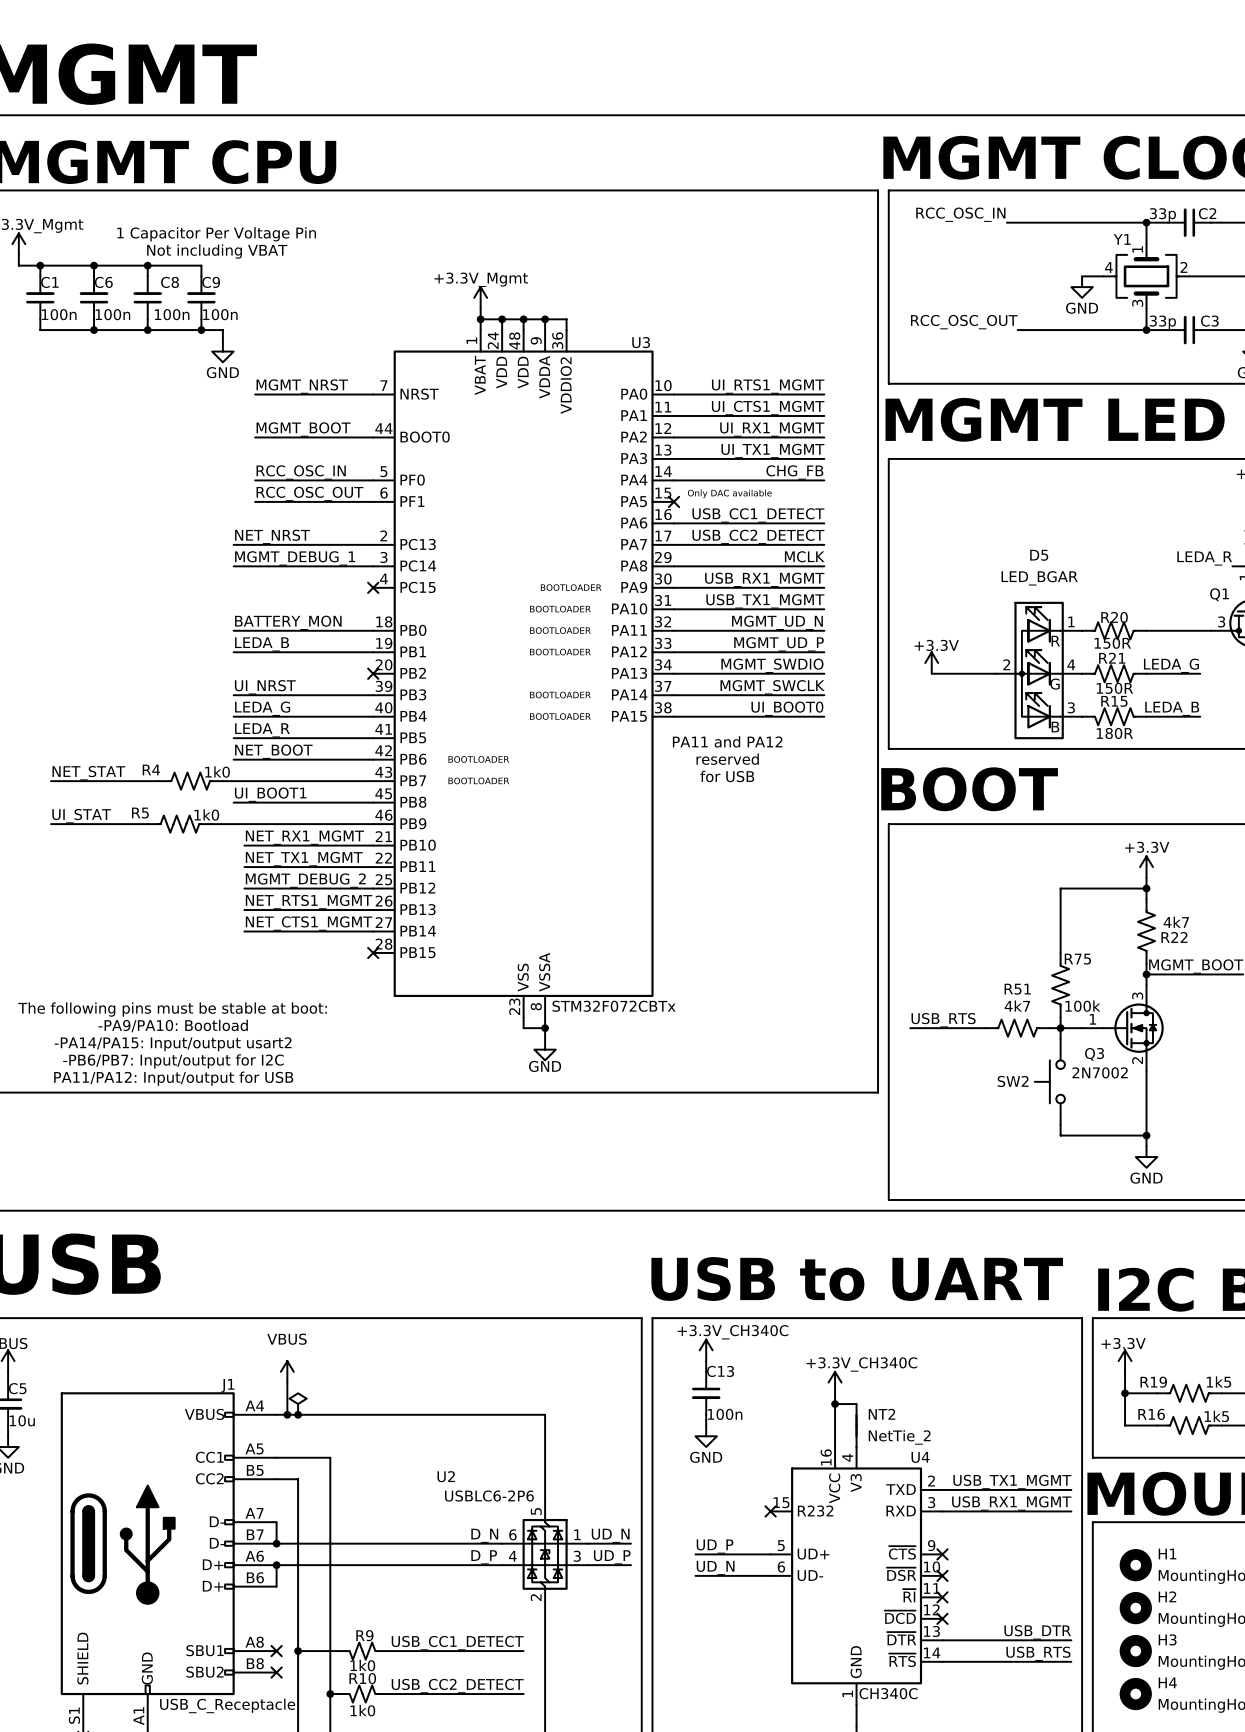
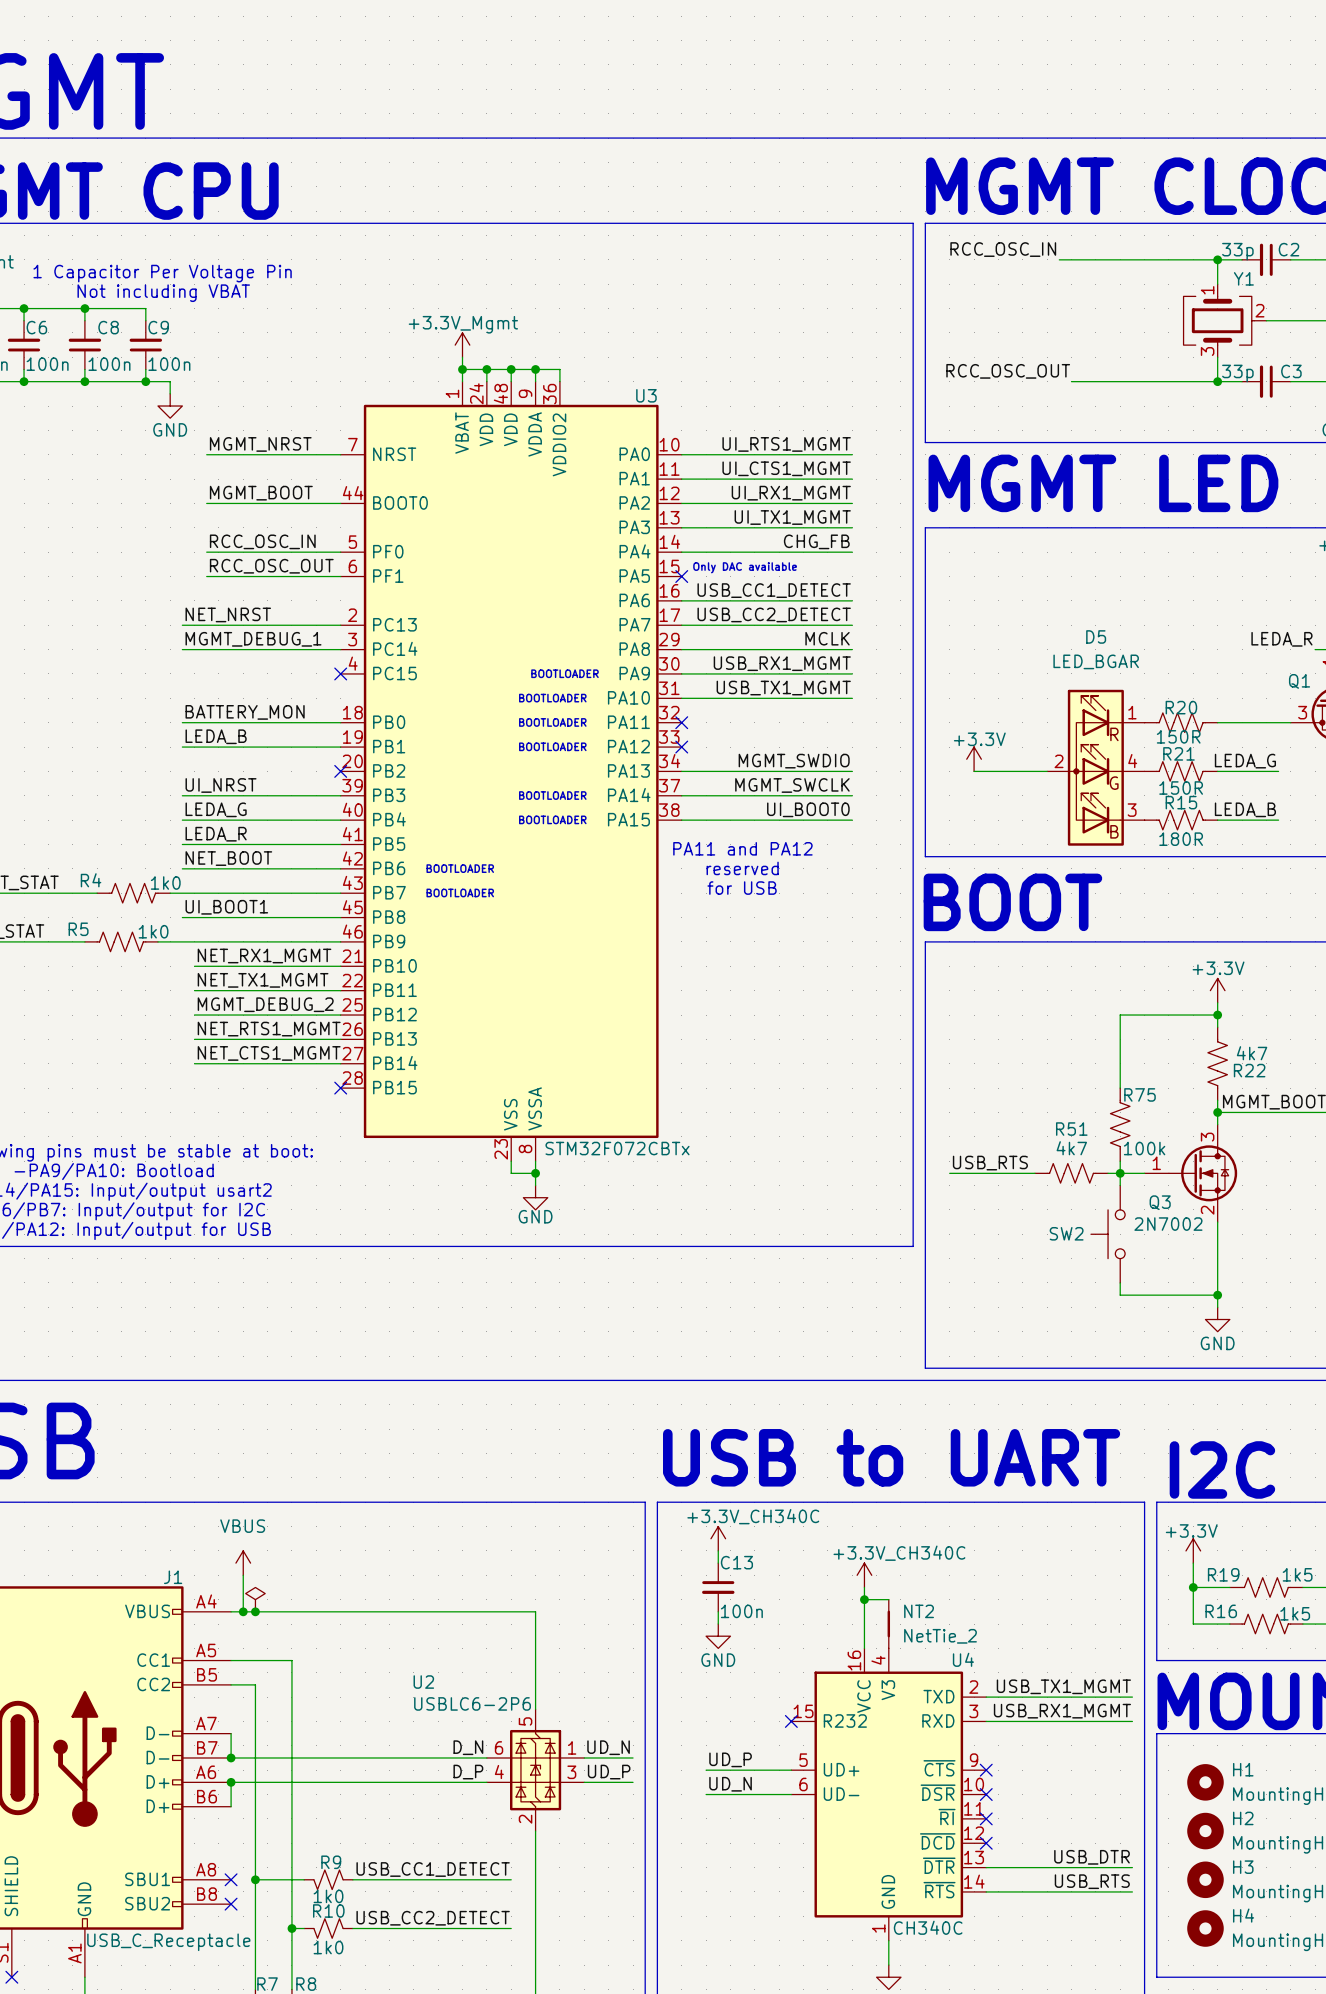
Y1 name position: Y1 (1122, 239) -> Y1 (1243, 278)
Y1 symbol: [1103, 244, 1190, 309] -> [1183, 284, 1267, 358]
wire: (1082, 276) (1103, 276) -> none
power symbol: GND (1082, 287) -> none
label: MGMT_UD_N (777, 622) -> none
wire: (673, 630) (824, 630) -> none
no-connect mark: none -> (681, 722)
label: MGMT_UD_P (779, 644) -> none
wire: (673, 652) (824, 652) -> none
no-connect mark: none -> (681, 747)

